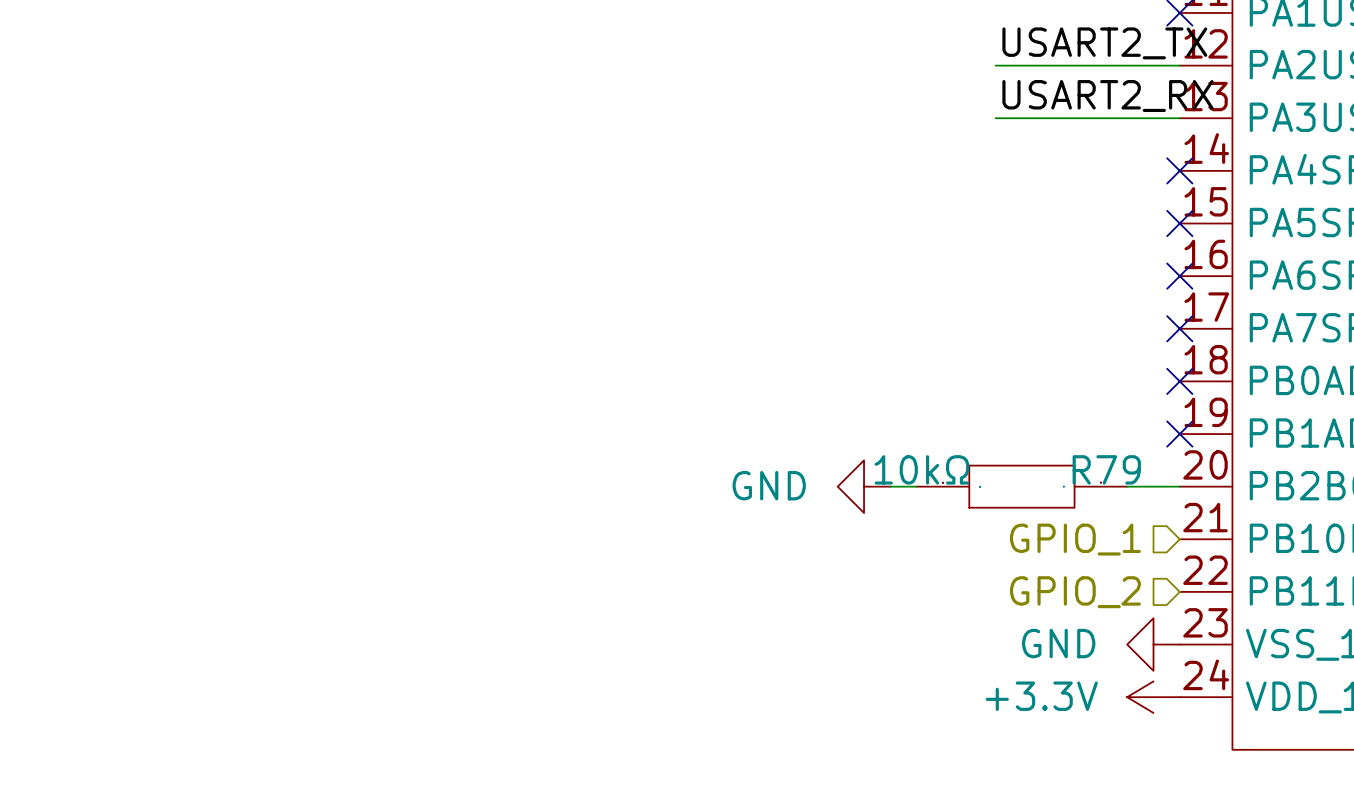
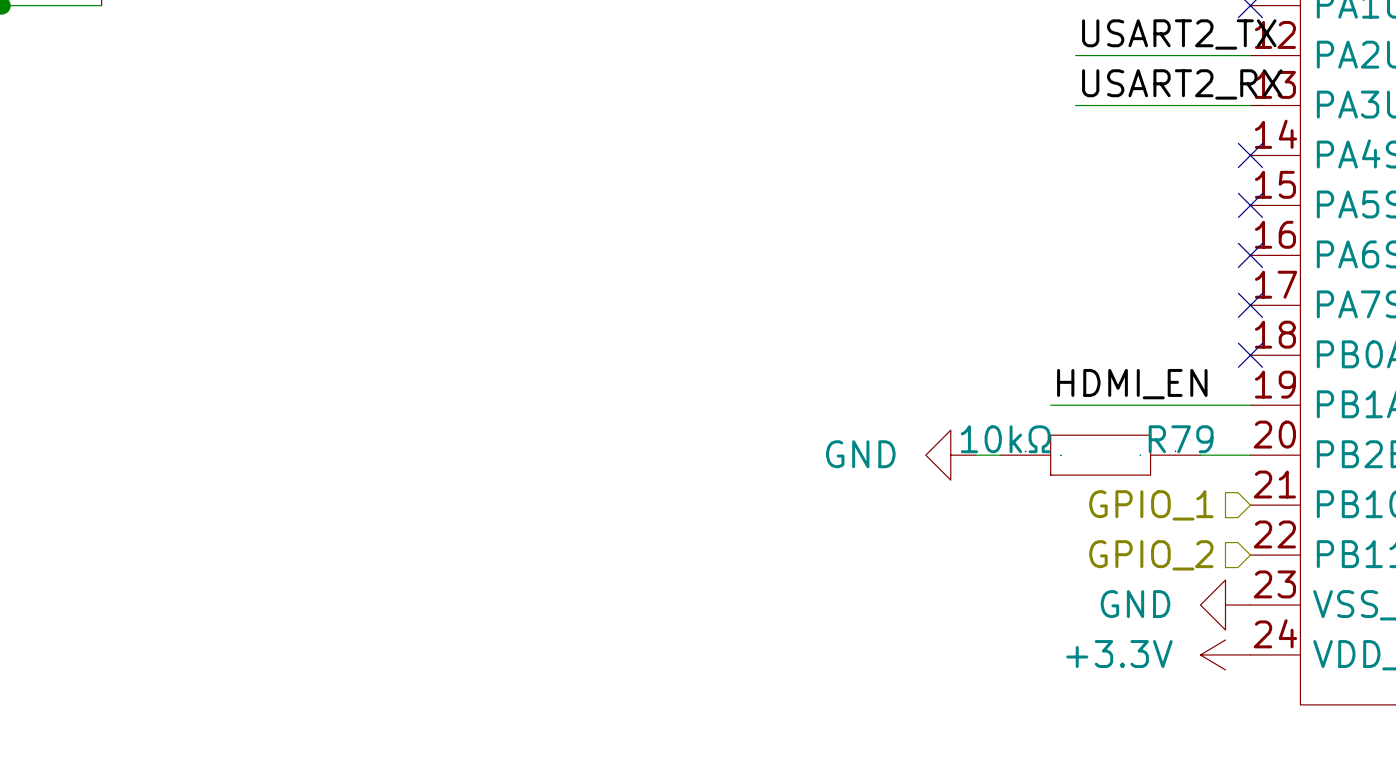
label: none -> HDMI_EN (1132, 384)
wire: none -> (1050, 405) (1250, 405)
no-connect mark: (1179, 434) -> none

